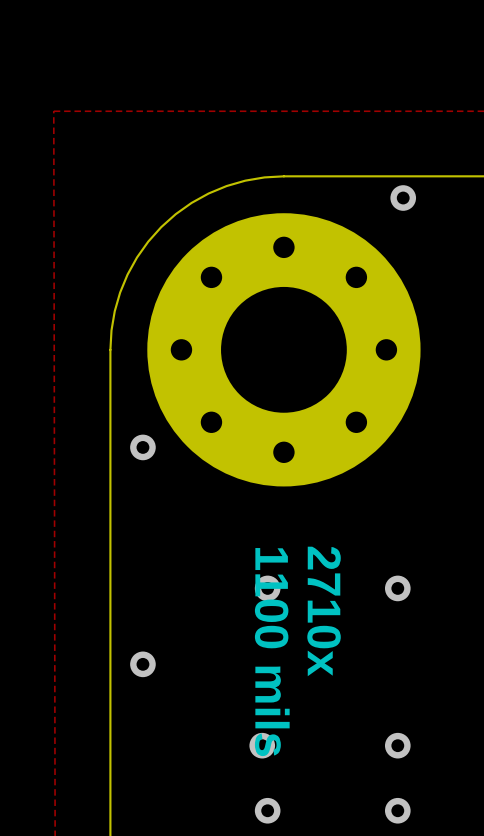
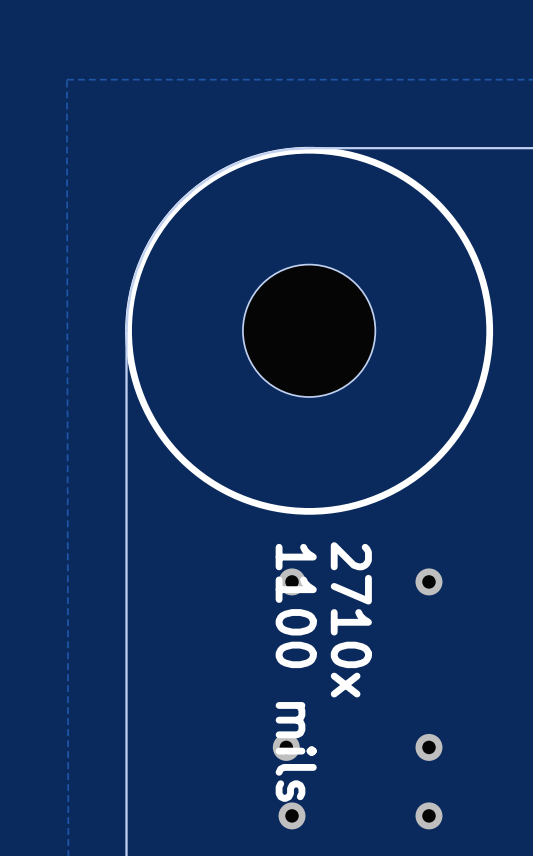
via: (403, 198) -> none
part footprint: [147, 213, 421, 487] -> [125, 146, 494, 515]
via: (142, 447) -> none
via: (142, 664) -> none

